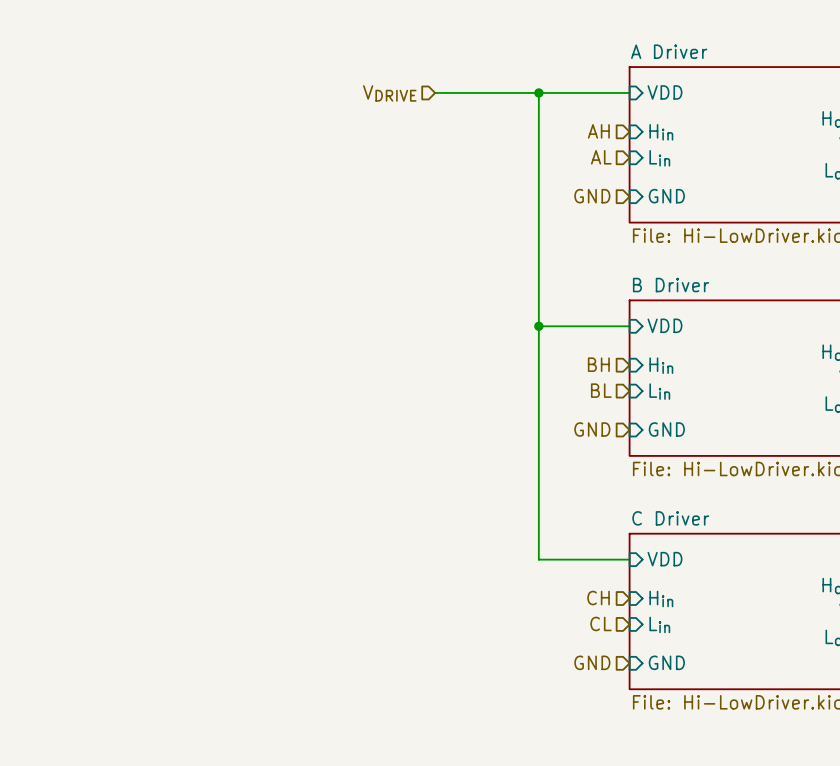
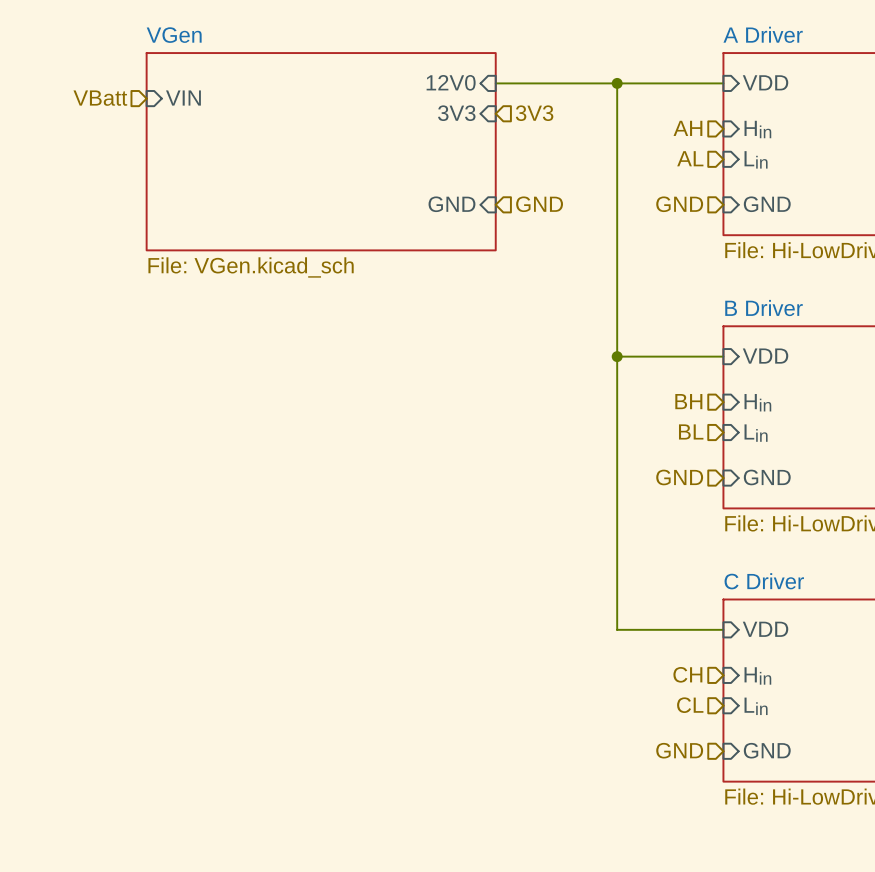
sheet pin: none -> 12V0 (451, 82)
hierarchical label: VDRIVE (389, 93) -> none
hierarchical label: none -> VBatt (100, 98)
sheet pin: none -> VIN (183, 98)
sheet pin: none -> 3V3 (456, 113)
hierarchical label: none -> 3V3 (534, 113)
sheet VGen: none -> File: VGen.kicad_sch (321, 151)
sheet pin: none -> GND (451, 204)
hierarchical label: none -> GND (539, 204)

